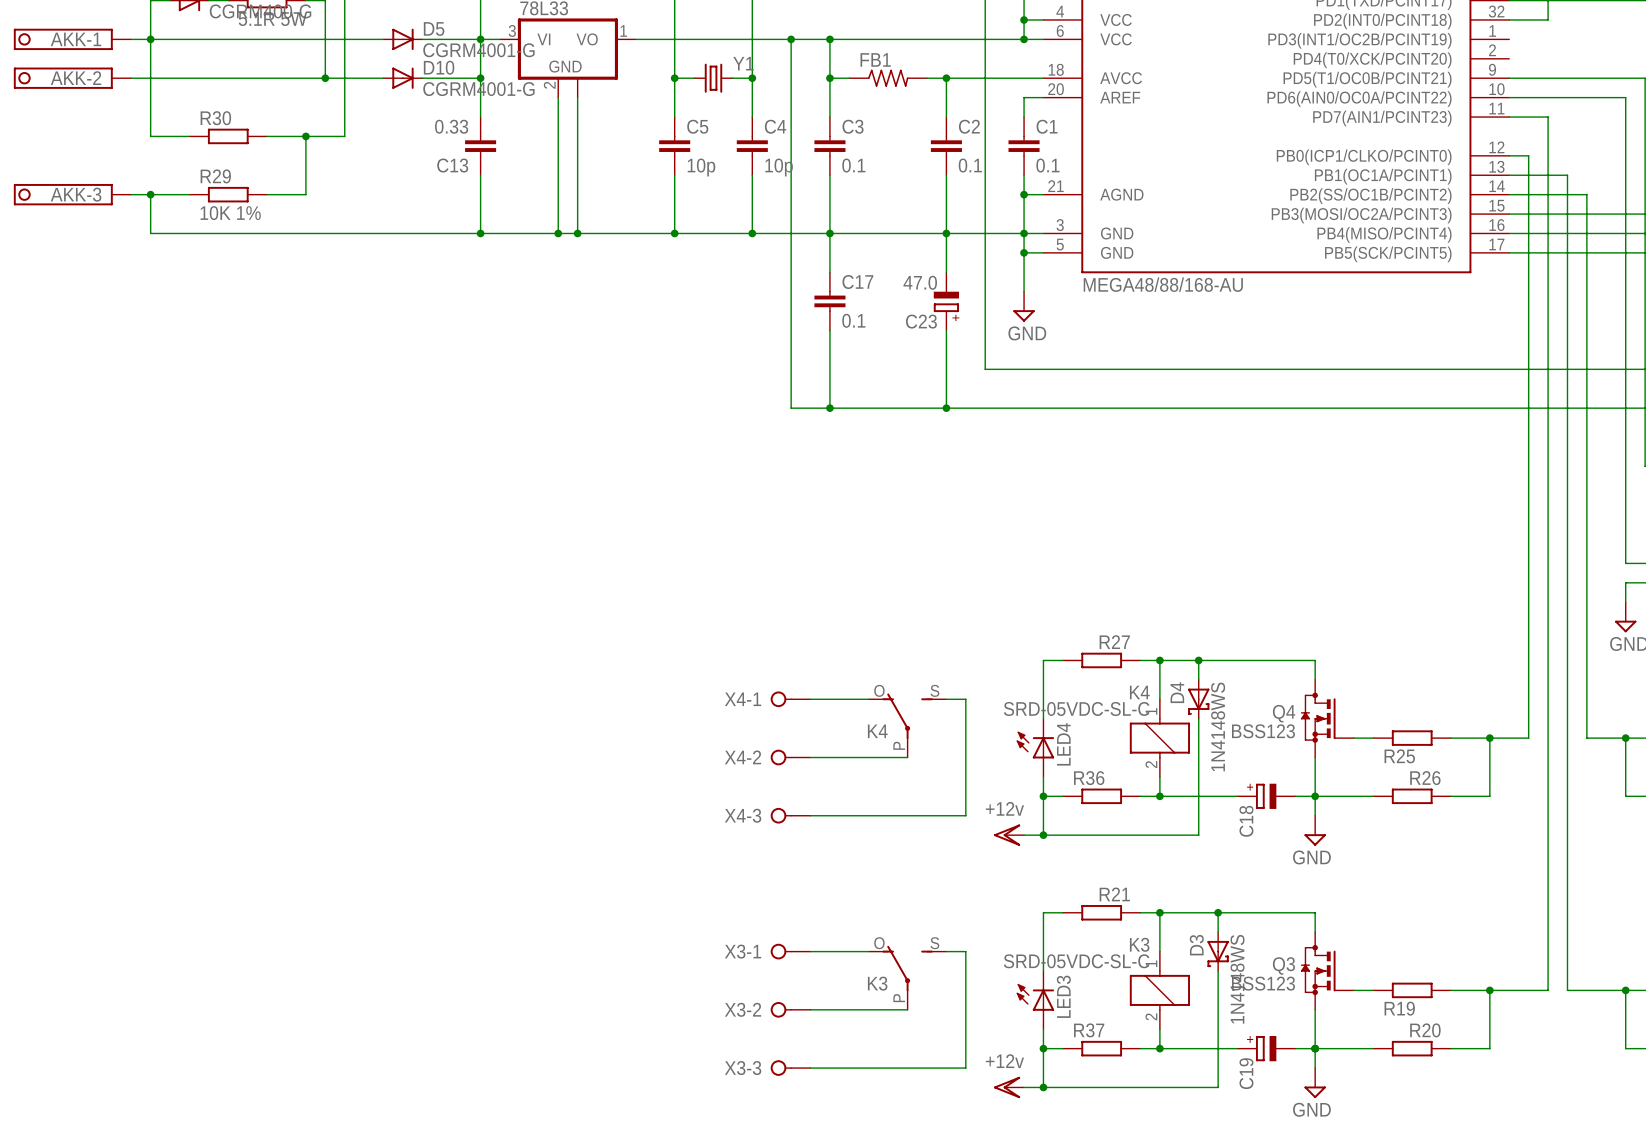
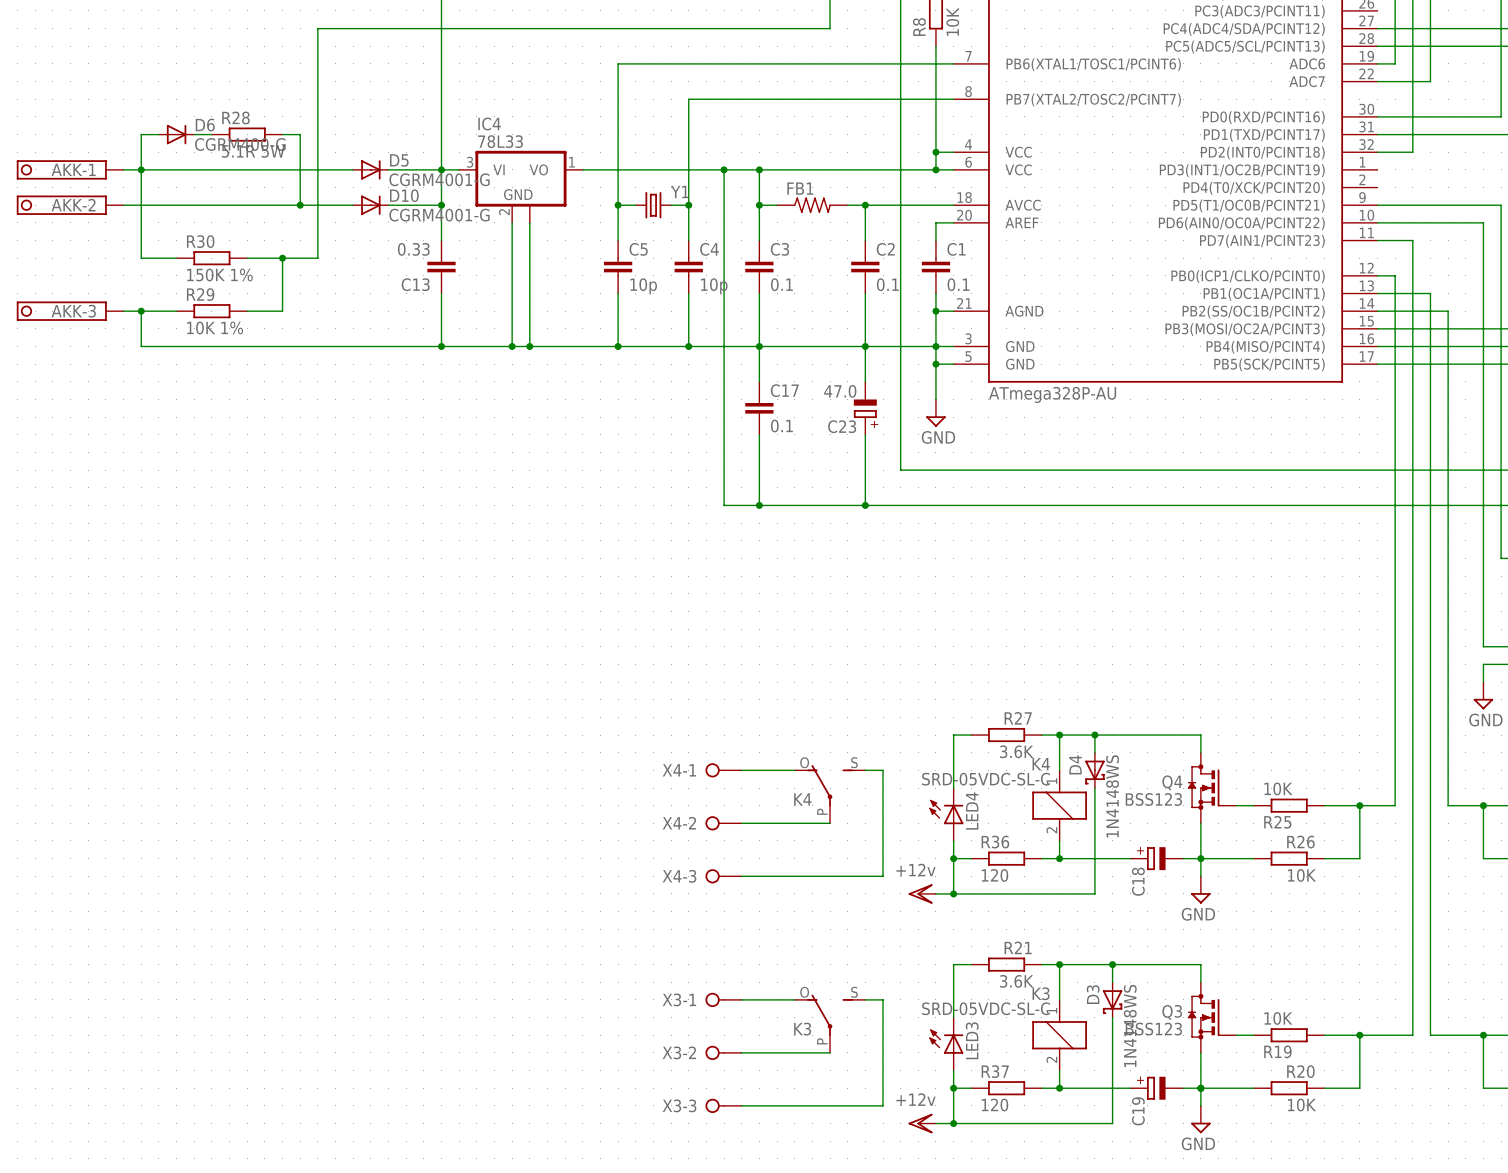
R30 value: none -> 150K 1% (219, 274)
part value: MEGA48/88/168-AU (1163, 284) -> ATmega328P-AU (1052, 394)
R27 value: none -> 3.6K (1016, 751)
R25 value: none -> 10K (1278, 788)
R36 value: none -> 120 (995, 875)
R26 value: none -> 10K (1301, 875)
R21 value: none -> 3.6K (1016, 981)
R19 value: none -> 10K (1278, 1018)
R37 value: none -> 120 (995, 1105)
R20 value: none -> 10K (1301, 1105)

